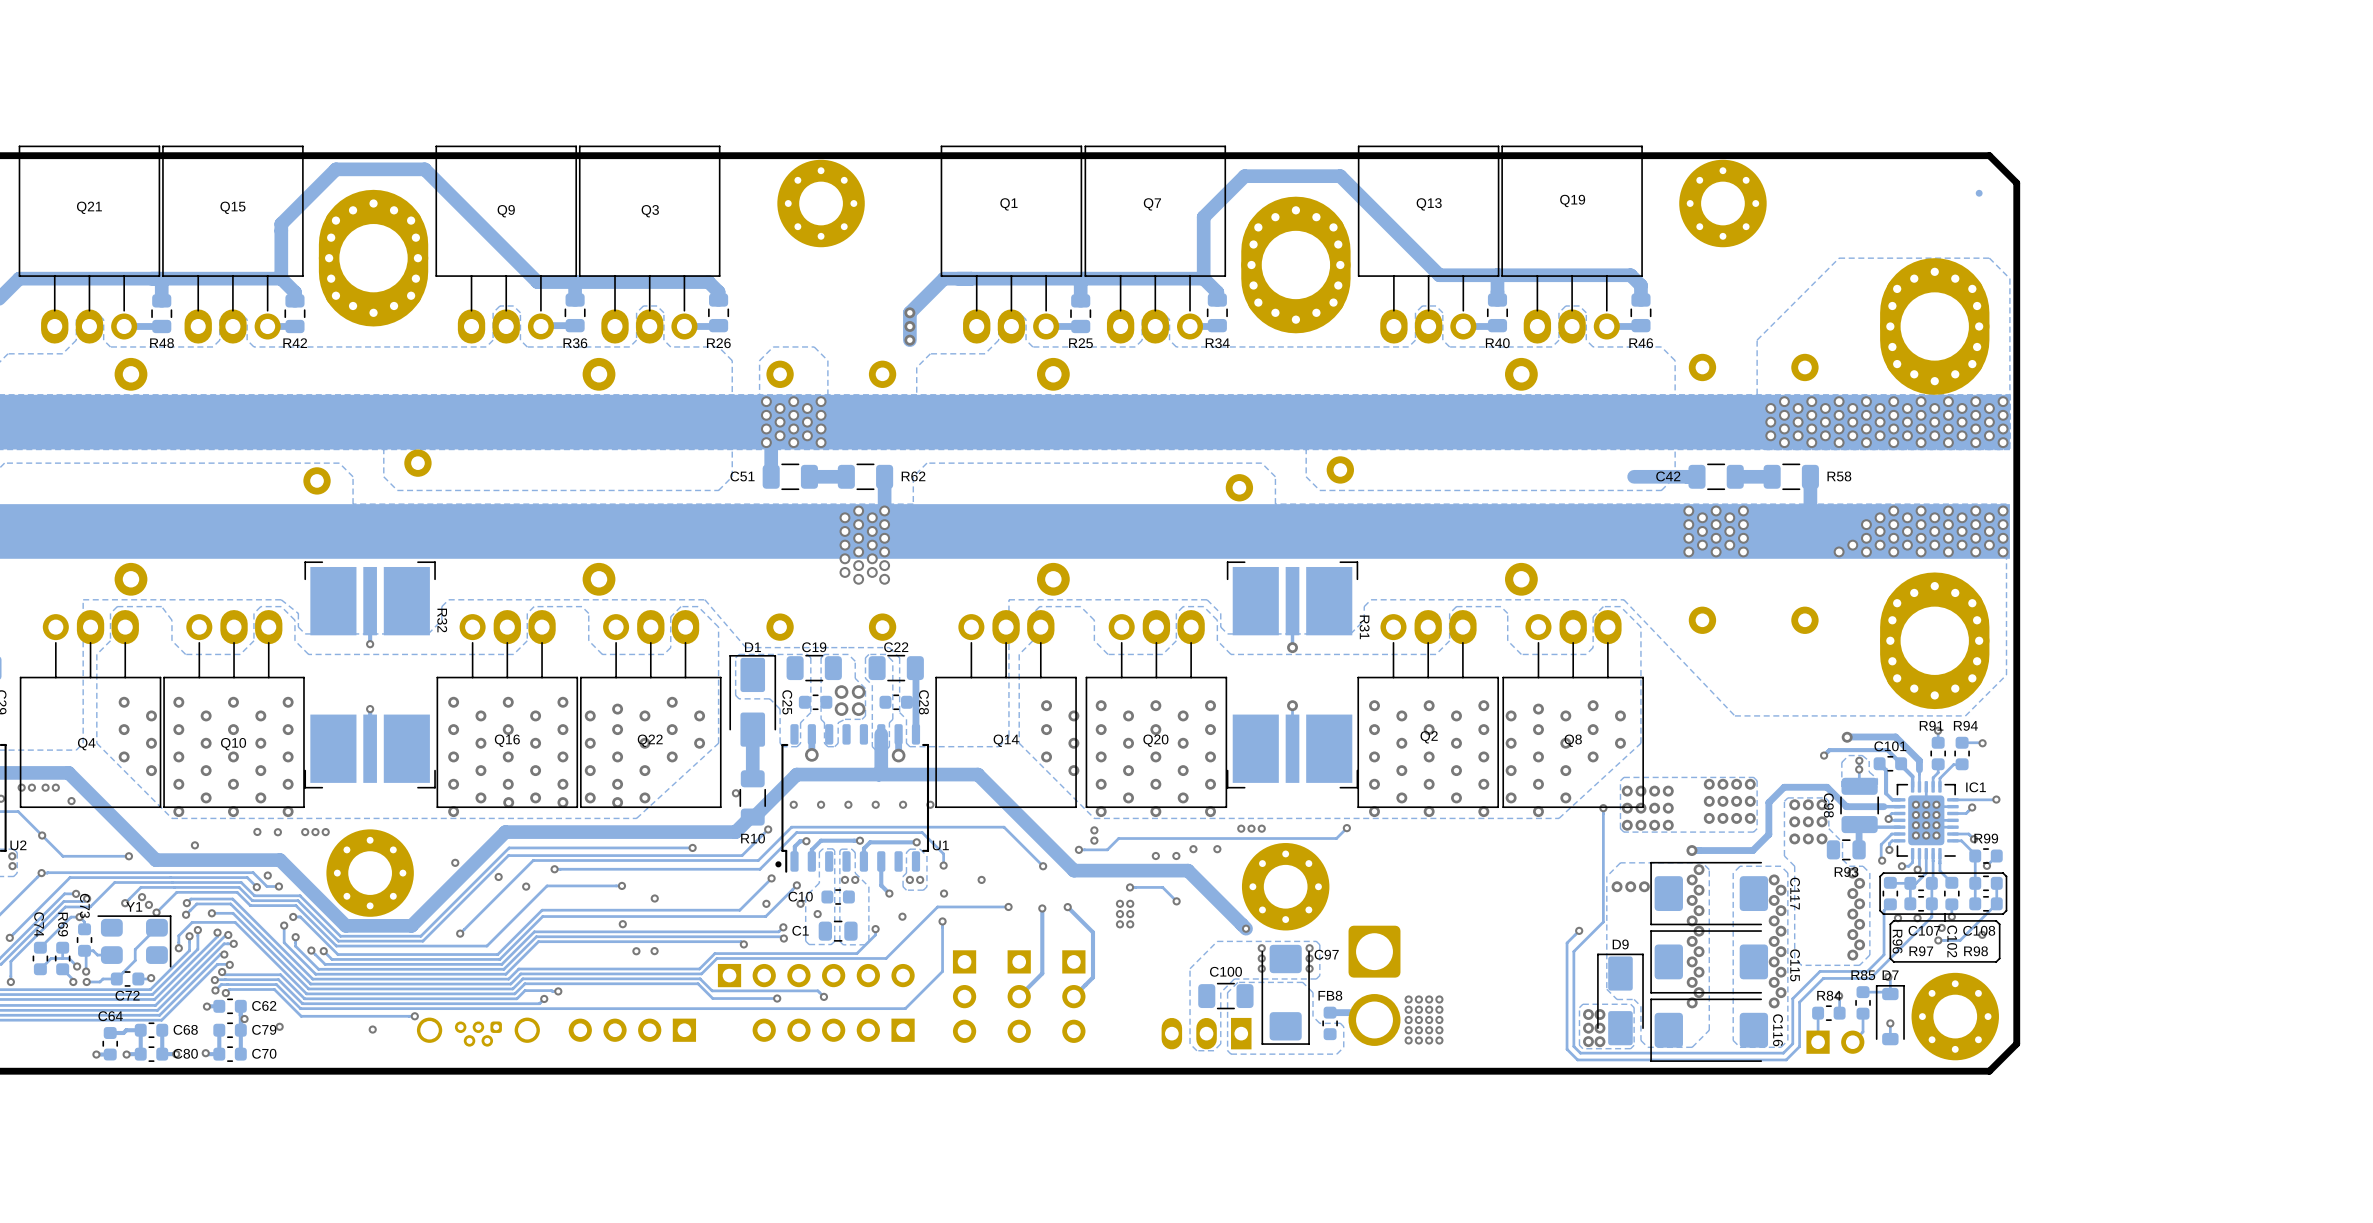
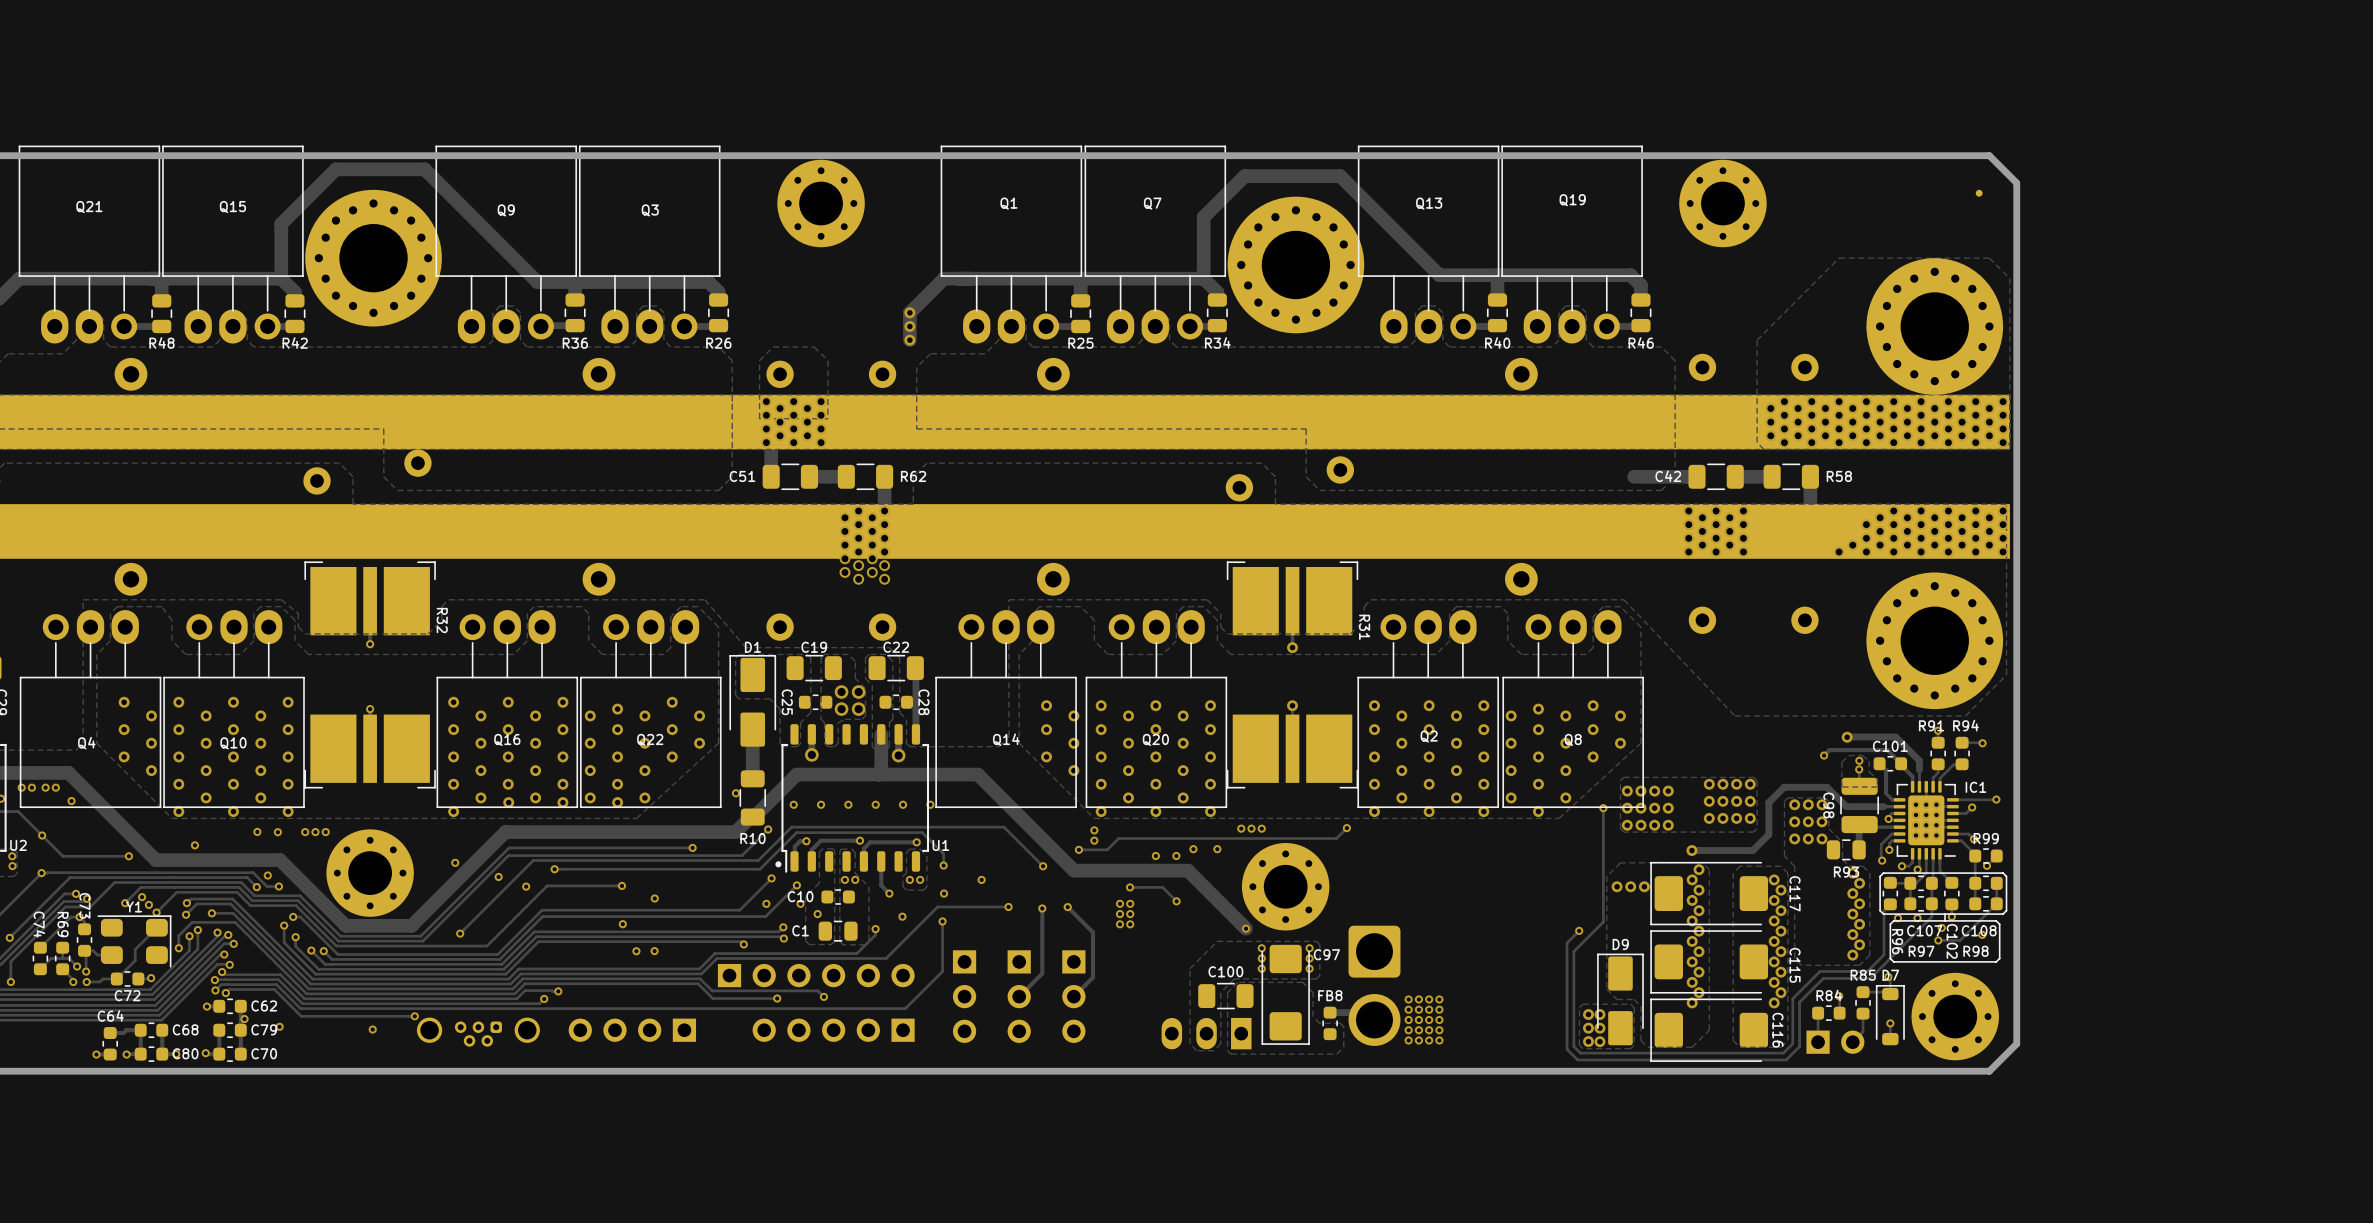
part footprint: [318, 189, 429, 327] -> [305, 189, 442, 327]
part footprint: [1241, 196, 1351, 334] -> [1227, 196, 1365, 334]
part footprint: [1880, 258, 1990, 395] -> [1866, 258, 2004, 395]
part footprint: [1880, 572, 1990, 710] -> [1866, 572, 2004, 710]

